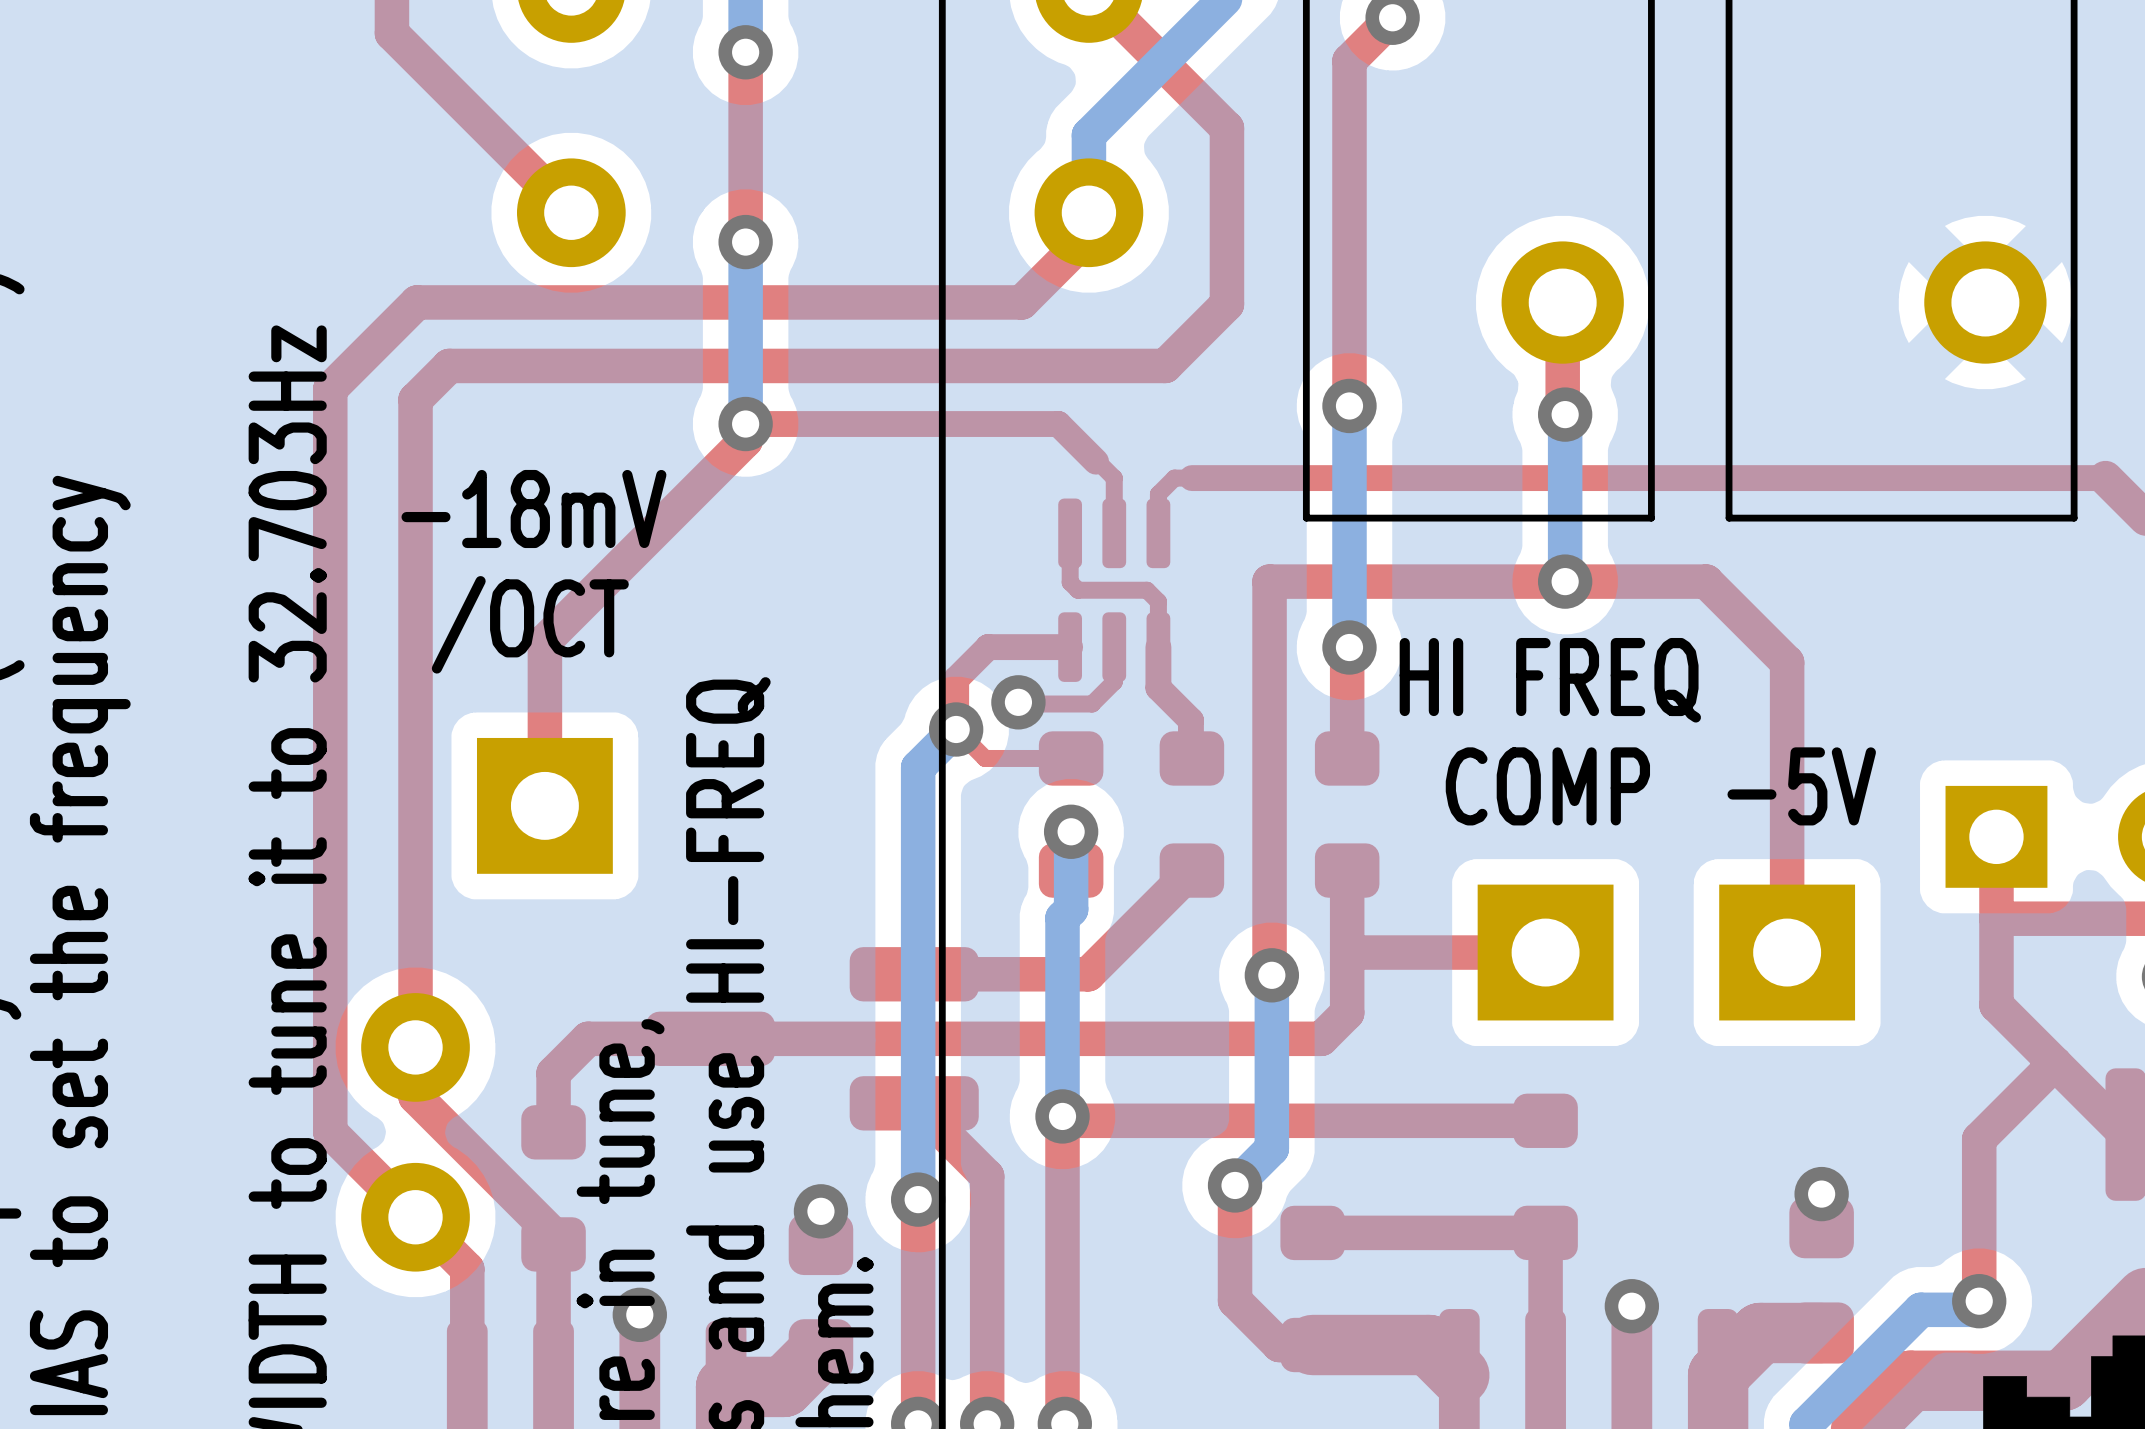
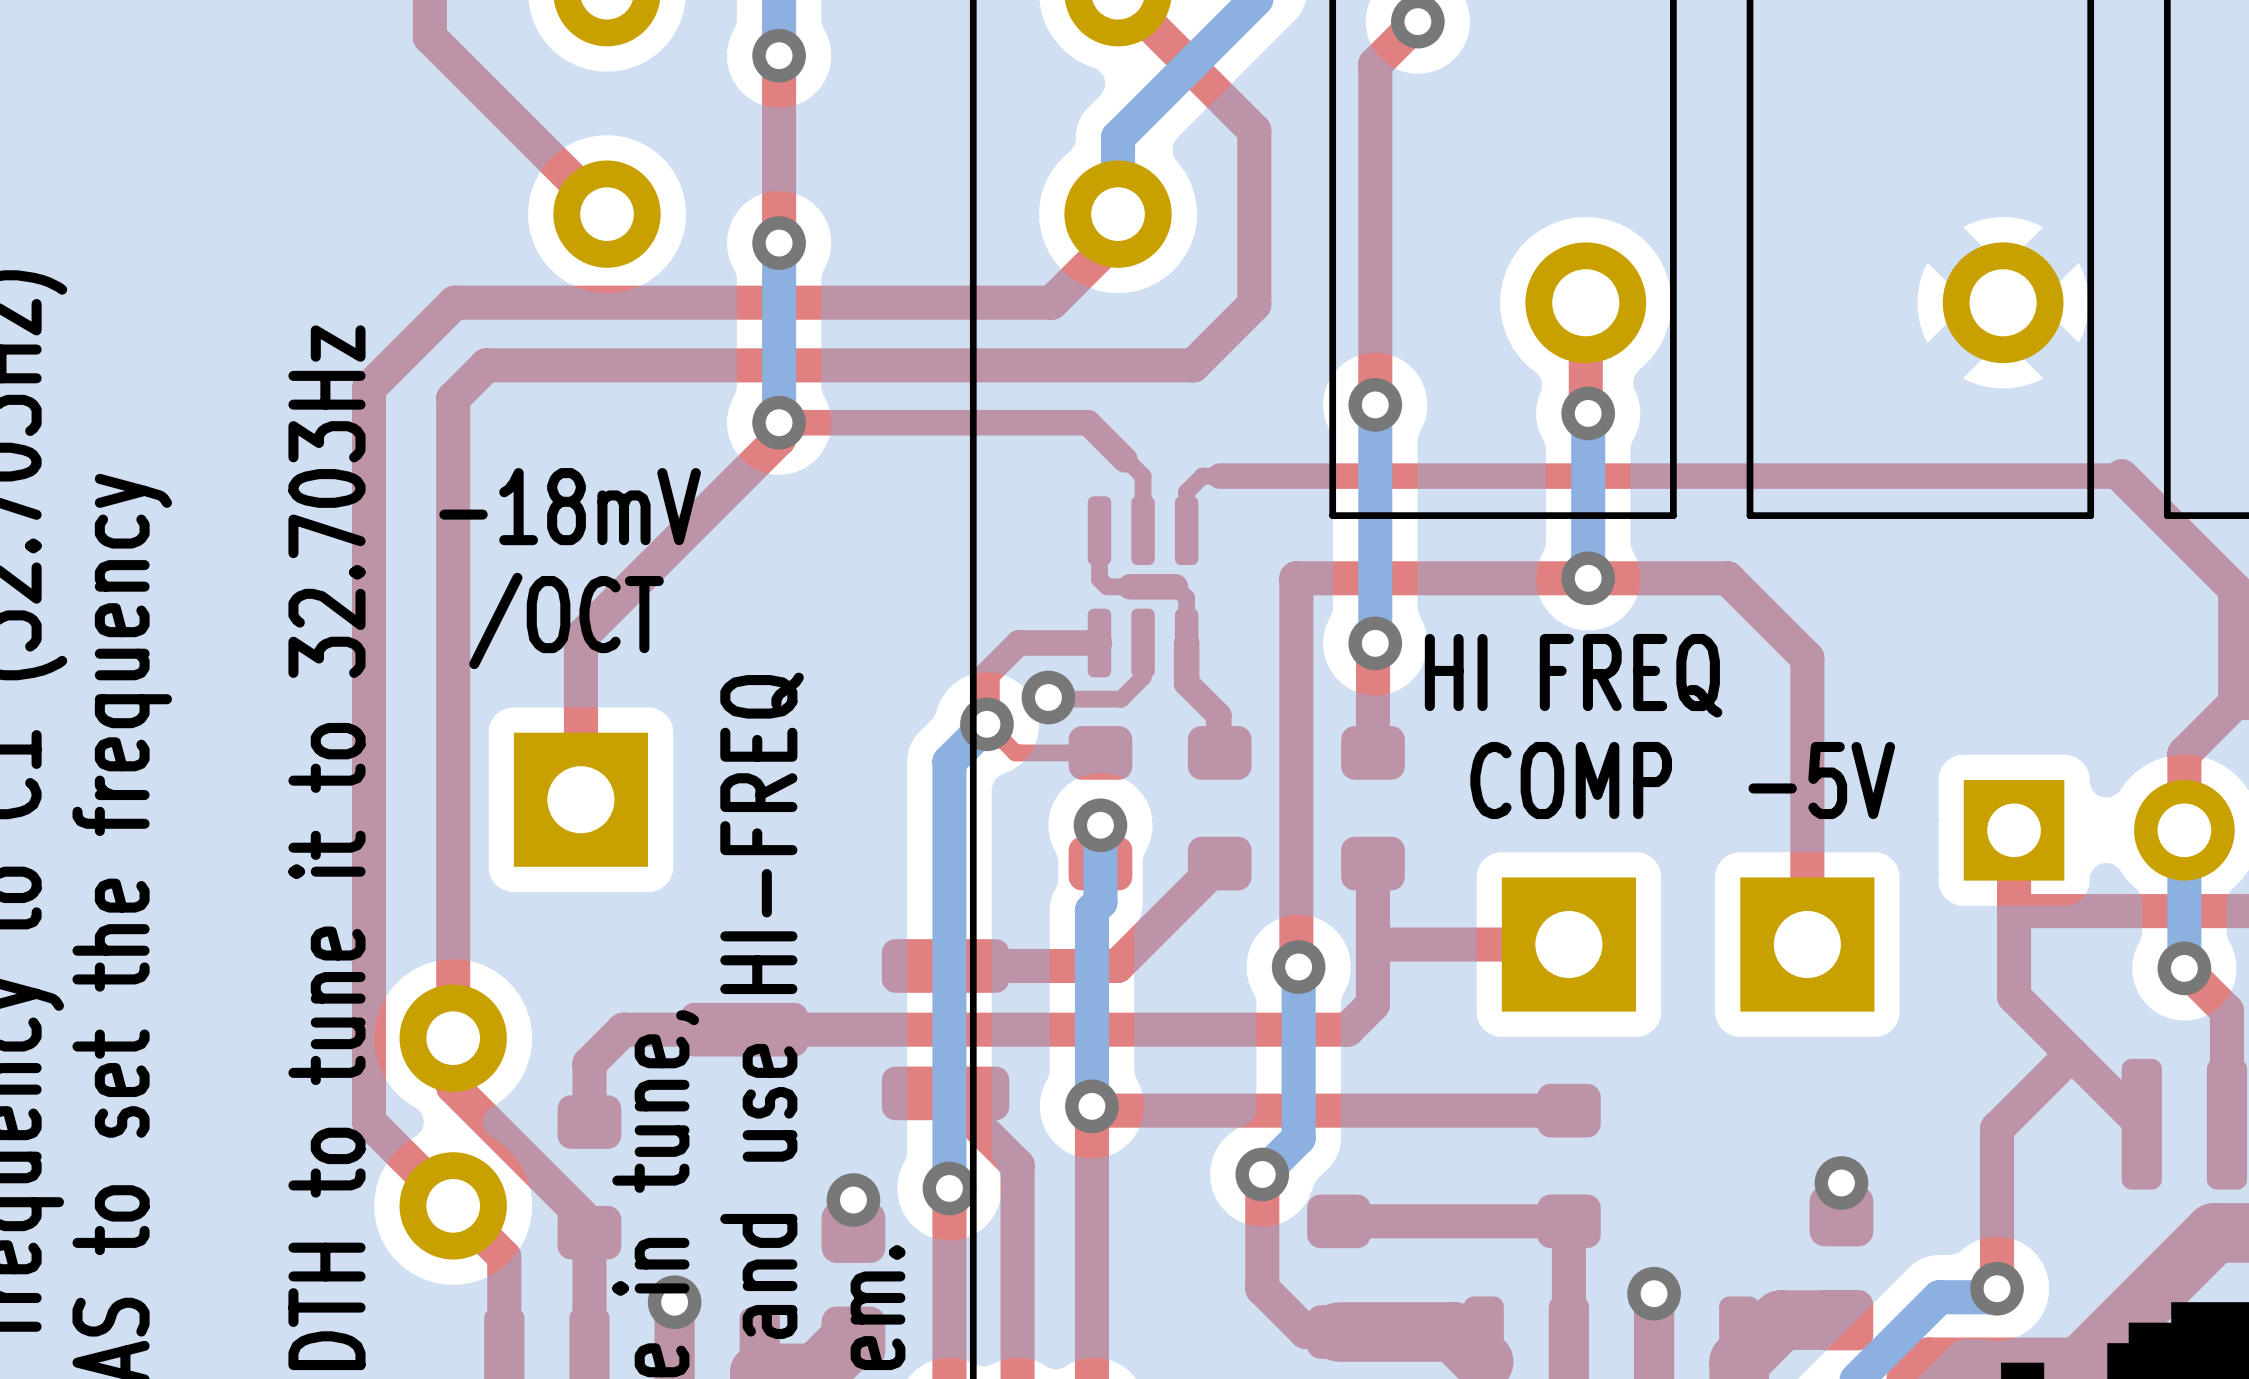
top track width: thin (1146, 590) (1101, 590) -> thick (1175, 586) (1130, 586)

